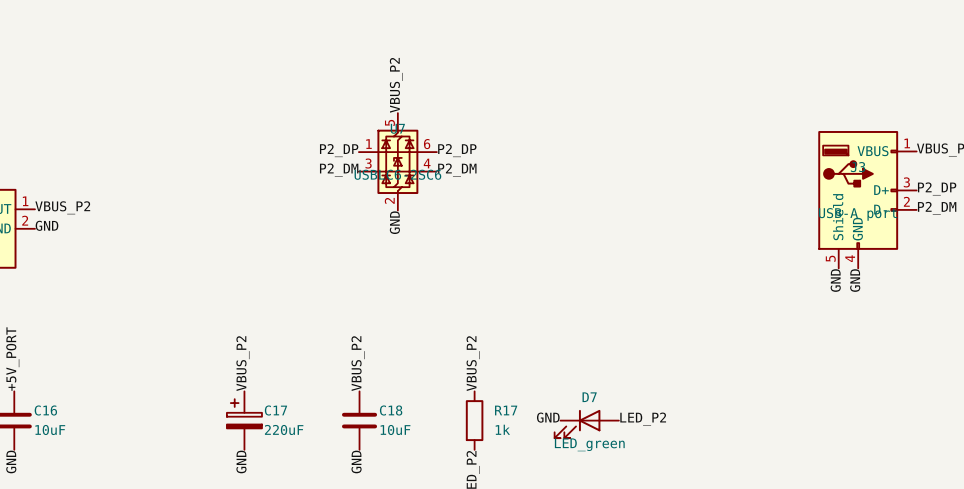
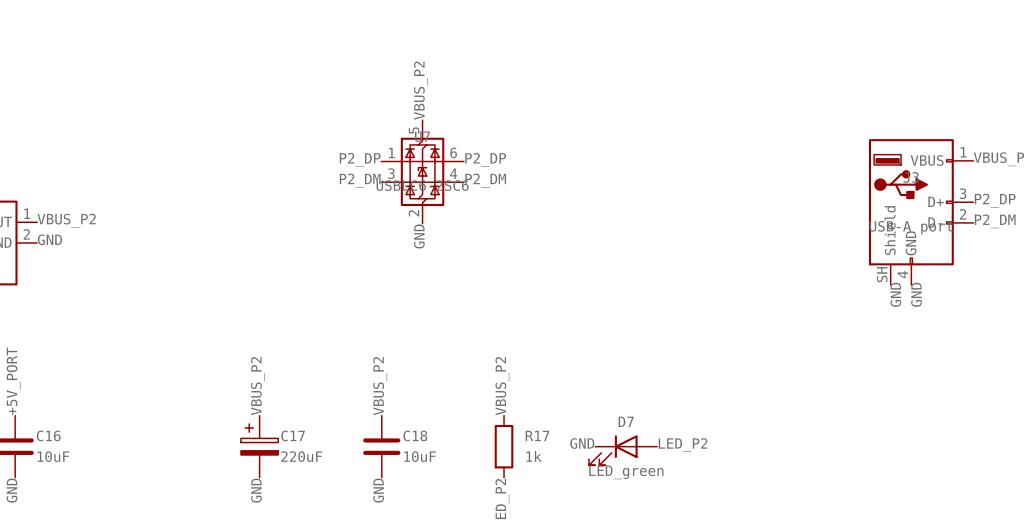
J3 pin number: 5 (830, 258) -> SH (882, 274)
label: none -> GND (895, 294)
label: none -> GND (916, 294)
label: GND (835, 280) -> none
label: GND (855, 280) -> none

